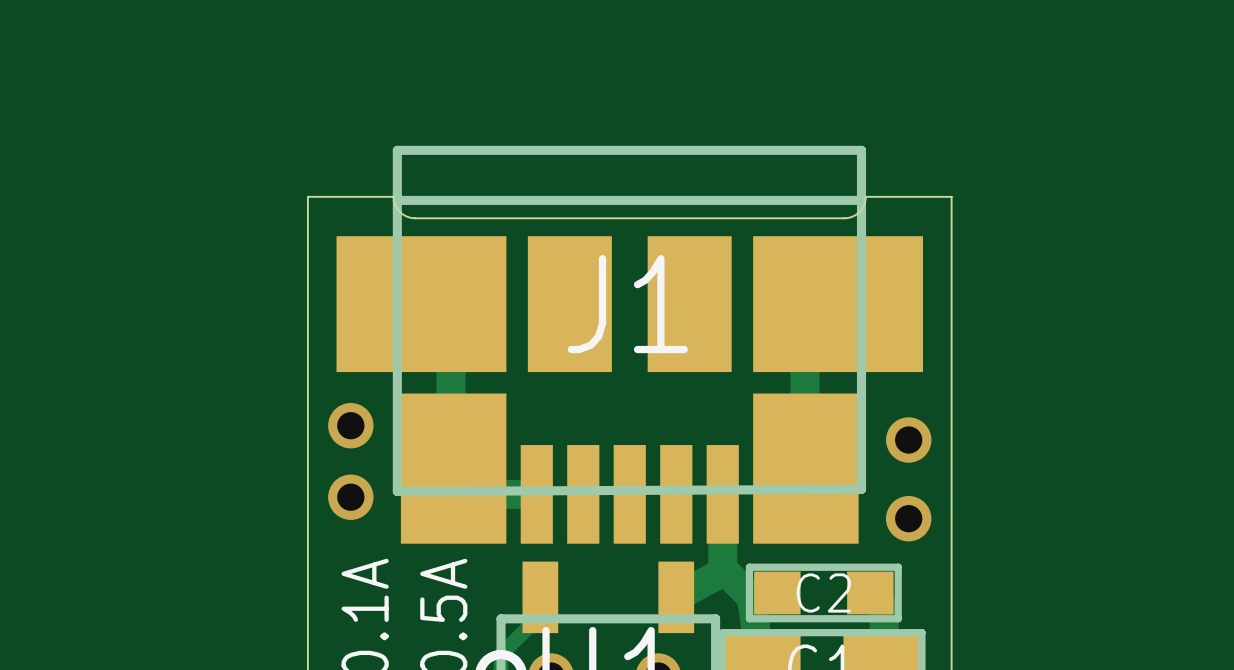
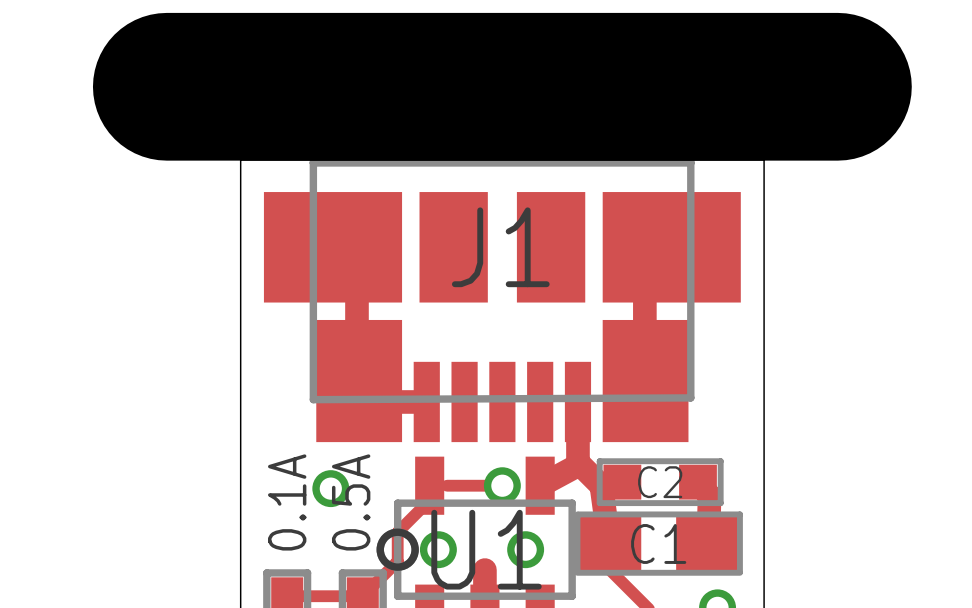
board edge: none -> (166, 86) (837, 86)
board edge: (393, 196) (395, 205) (400, 212) (406, 216) (415, 218) (844, 218) (852, 216) (859, 212) (864, 205) (865, 196) -> (310, 160) (694, 160)
via: (350, 425) -> none
via: (908, 440) -> none
via: (350, 497) -> none
via: (908, 518) -> none
track: none -> (447, 485) (502, 485)
via: none -> (502, 485)
via: none -> (330, 488)

